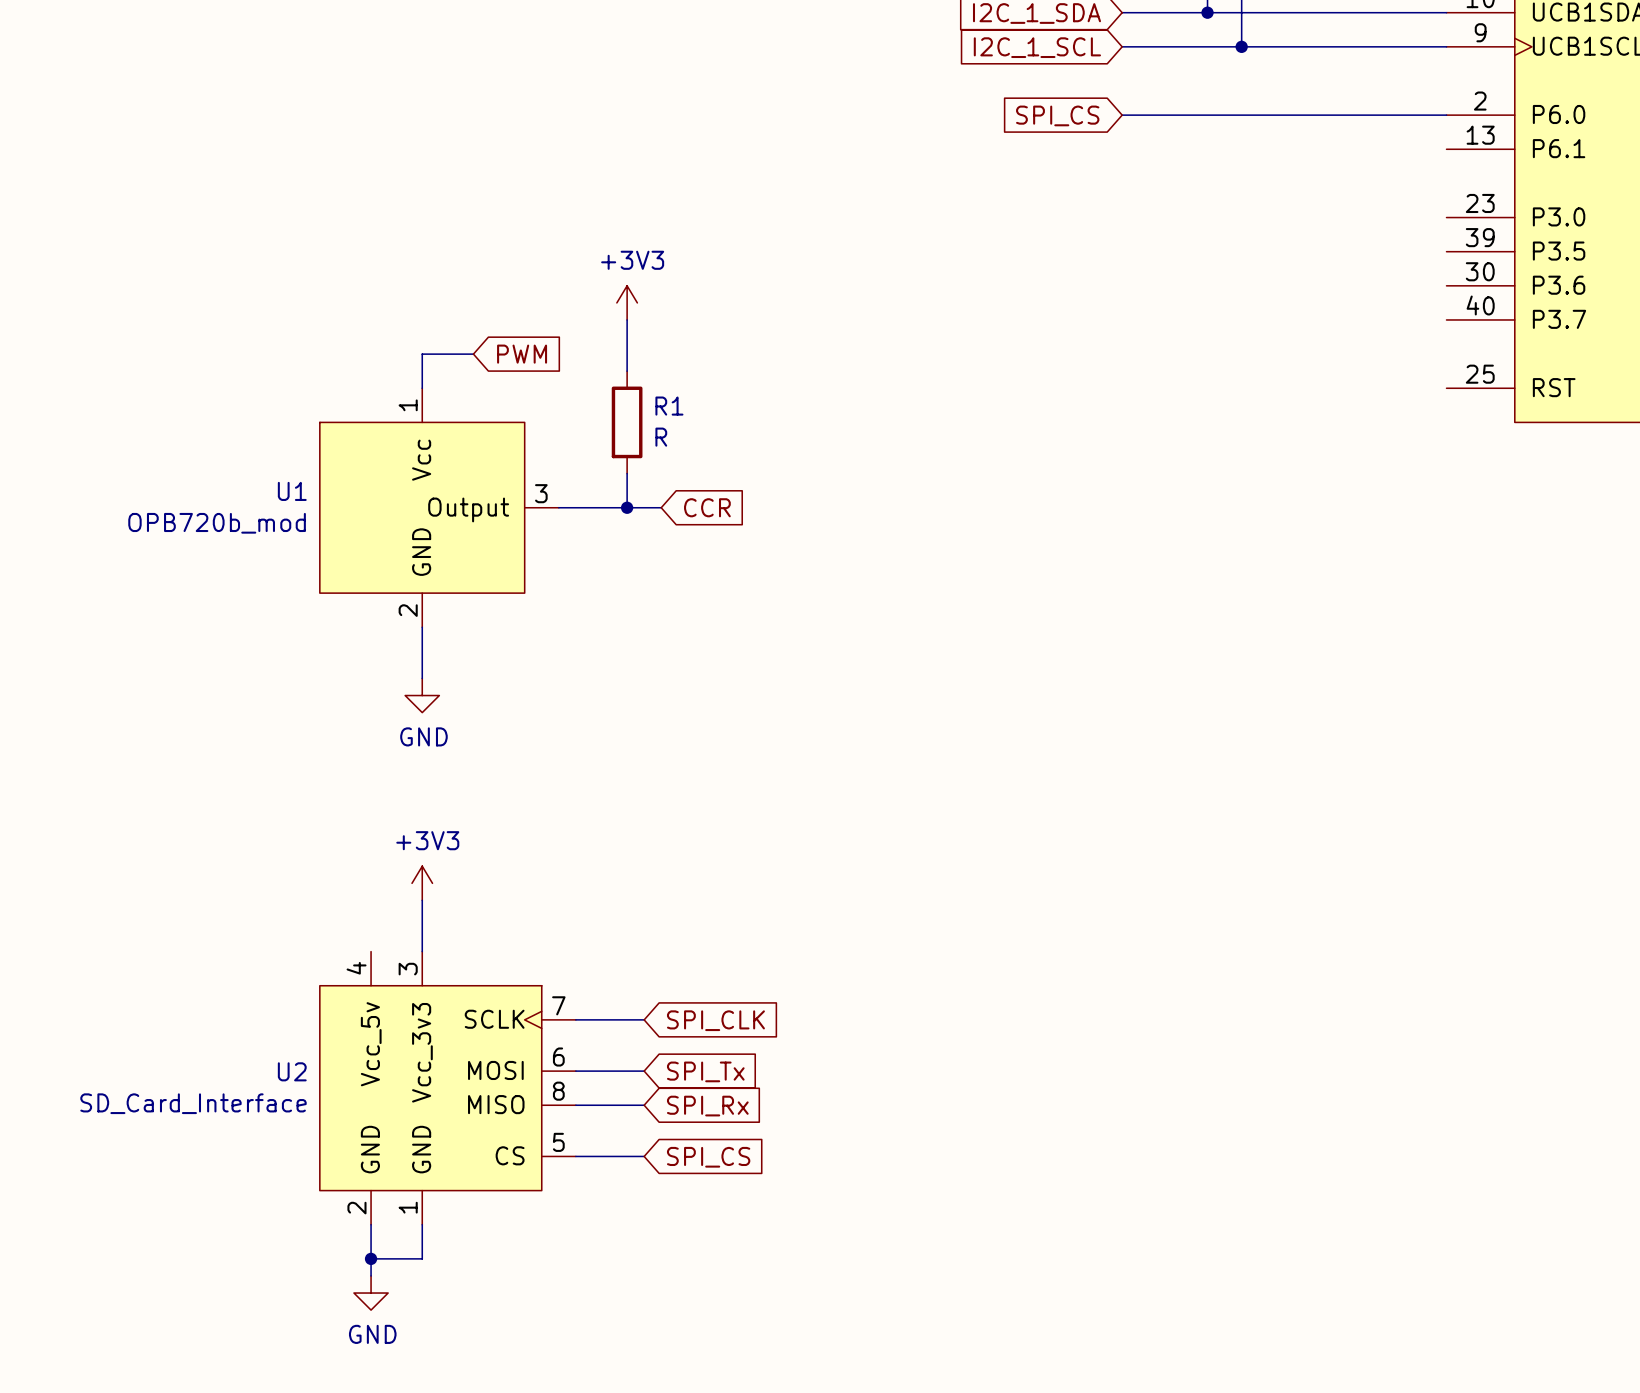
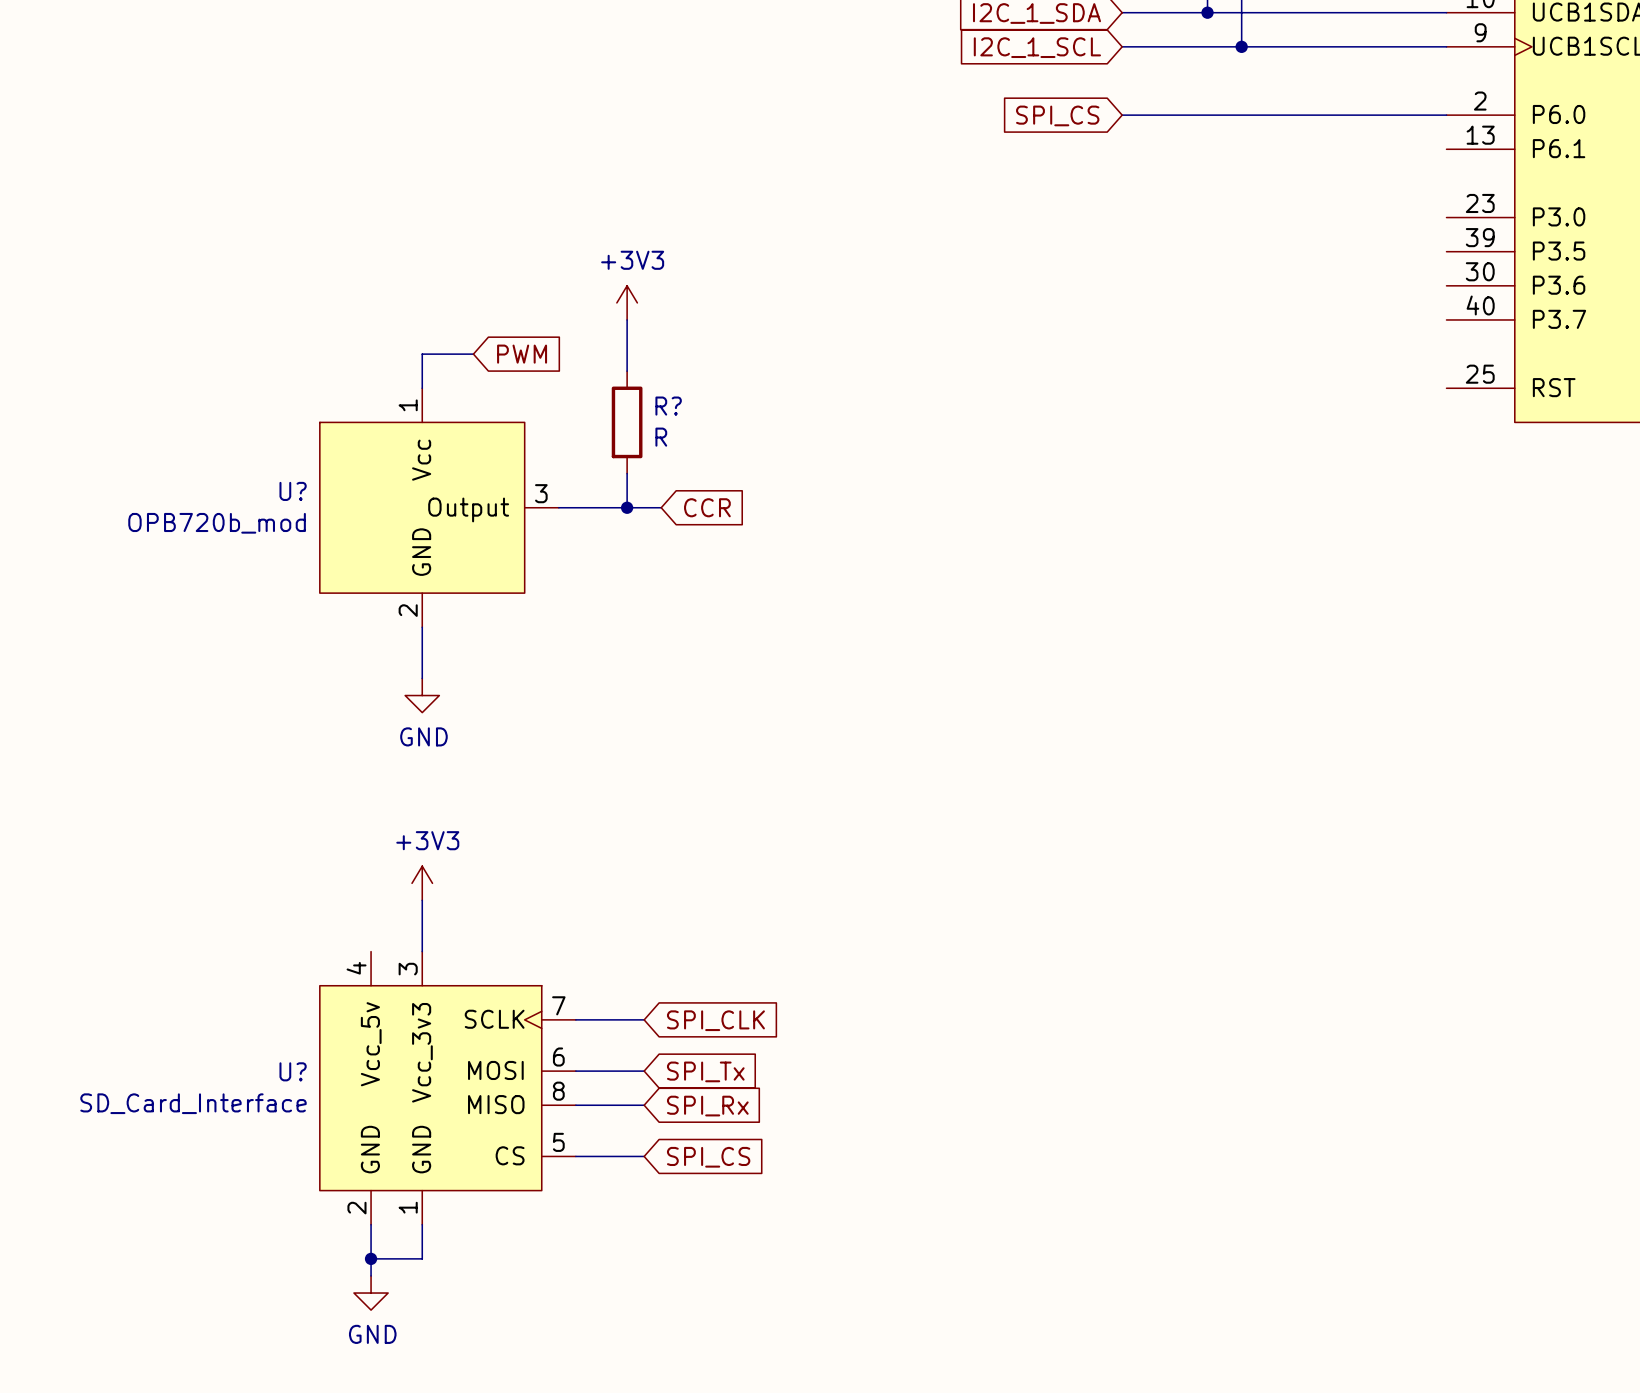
R1 name: R1 (669, 406) -> R? (668, 406)
U1 name: U1 (292, 491) -> U? (293, 491)
U2 name: U2 (292, 1071) -> U? (293, 1071)

